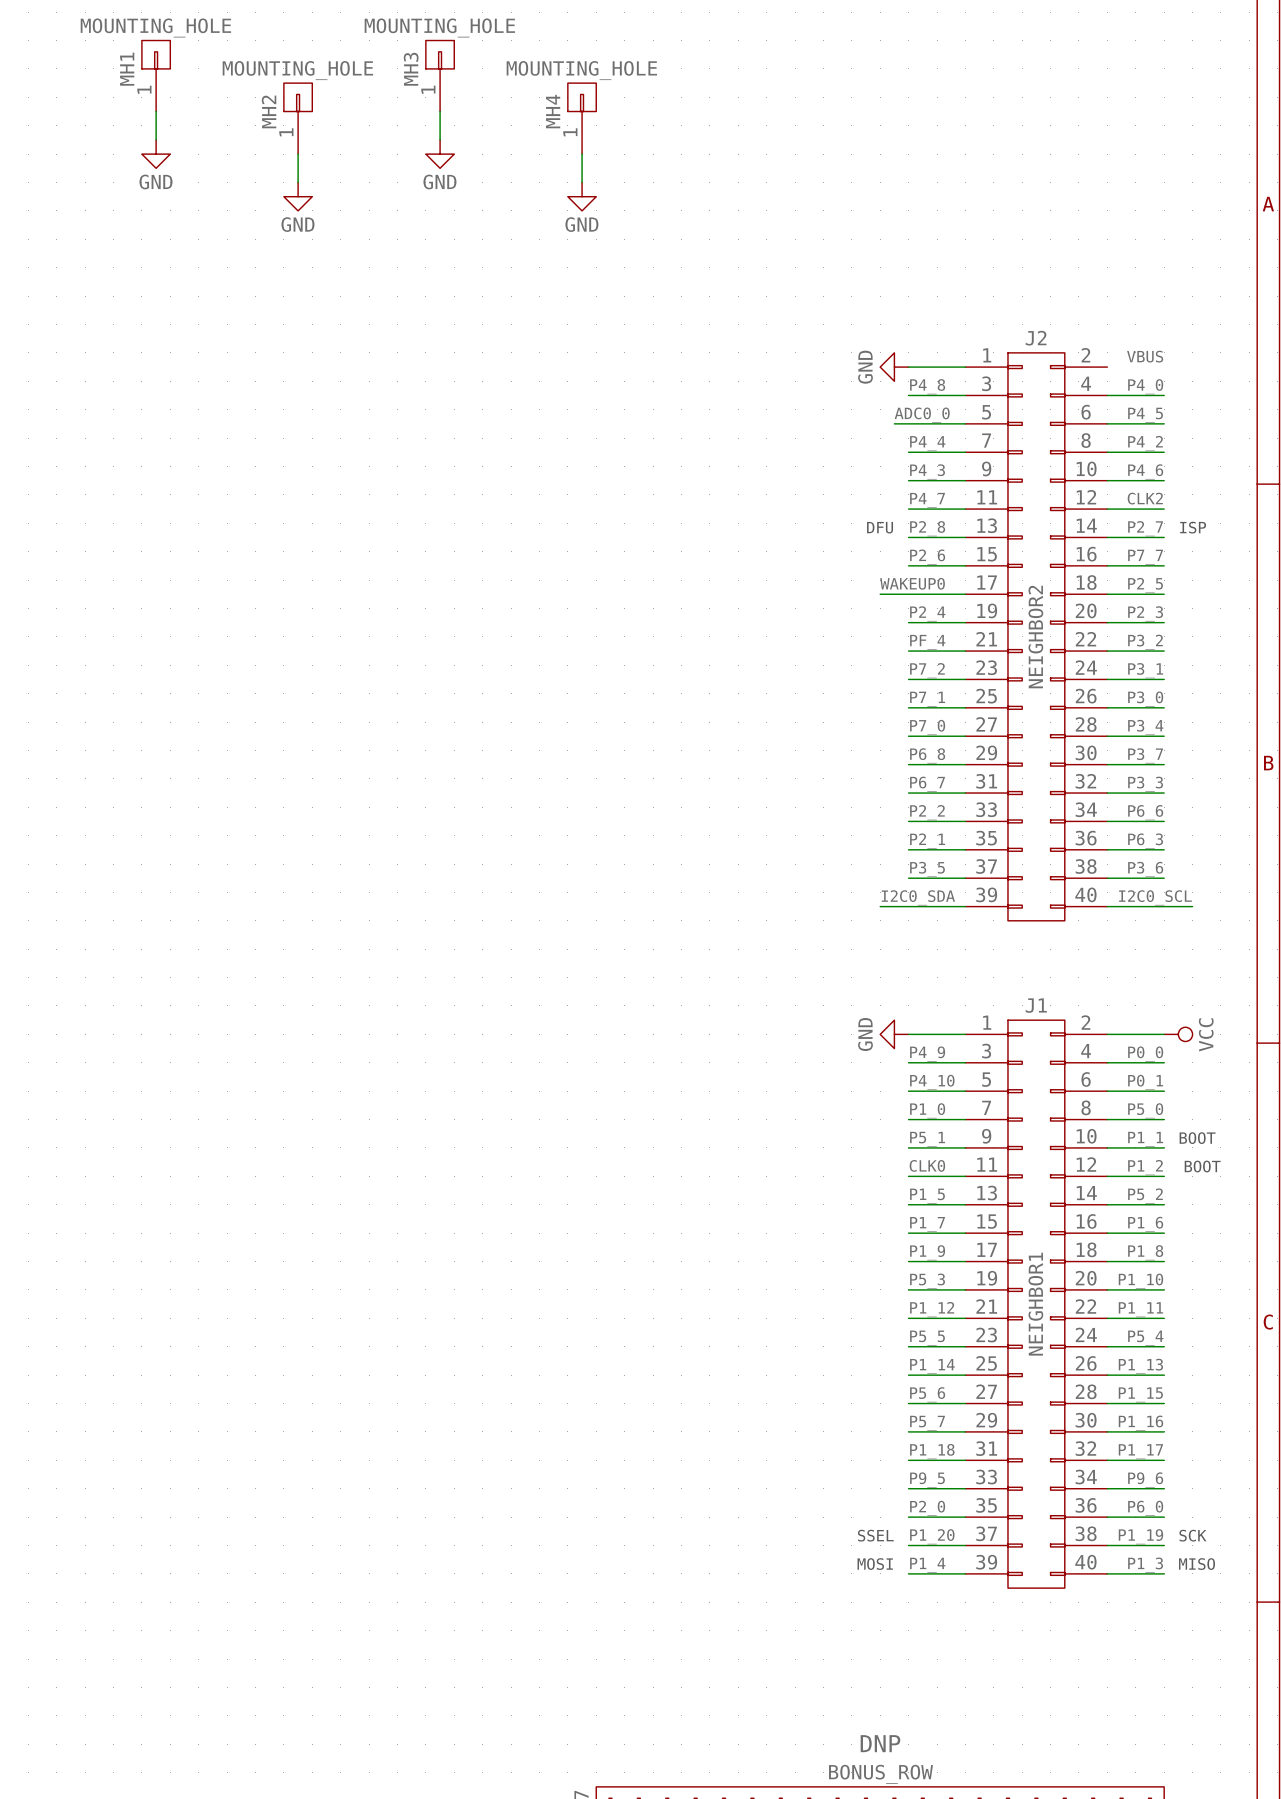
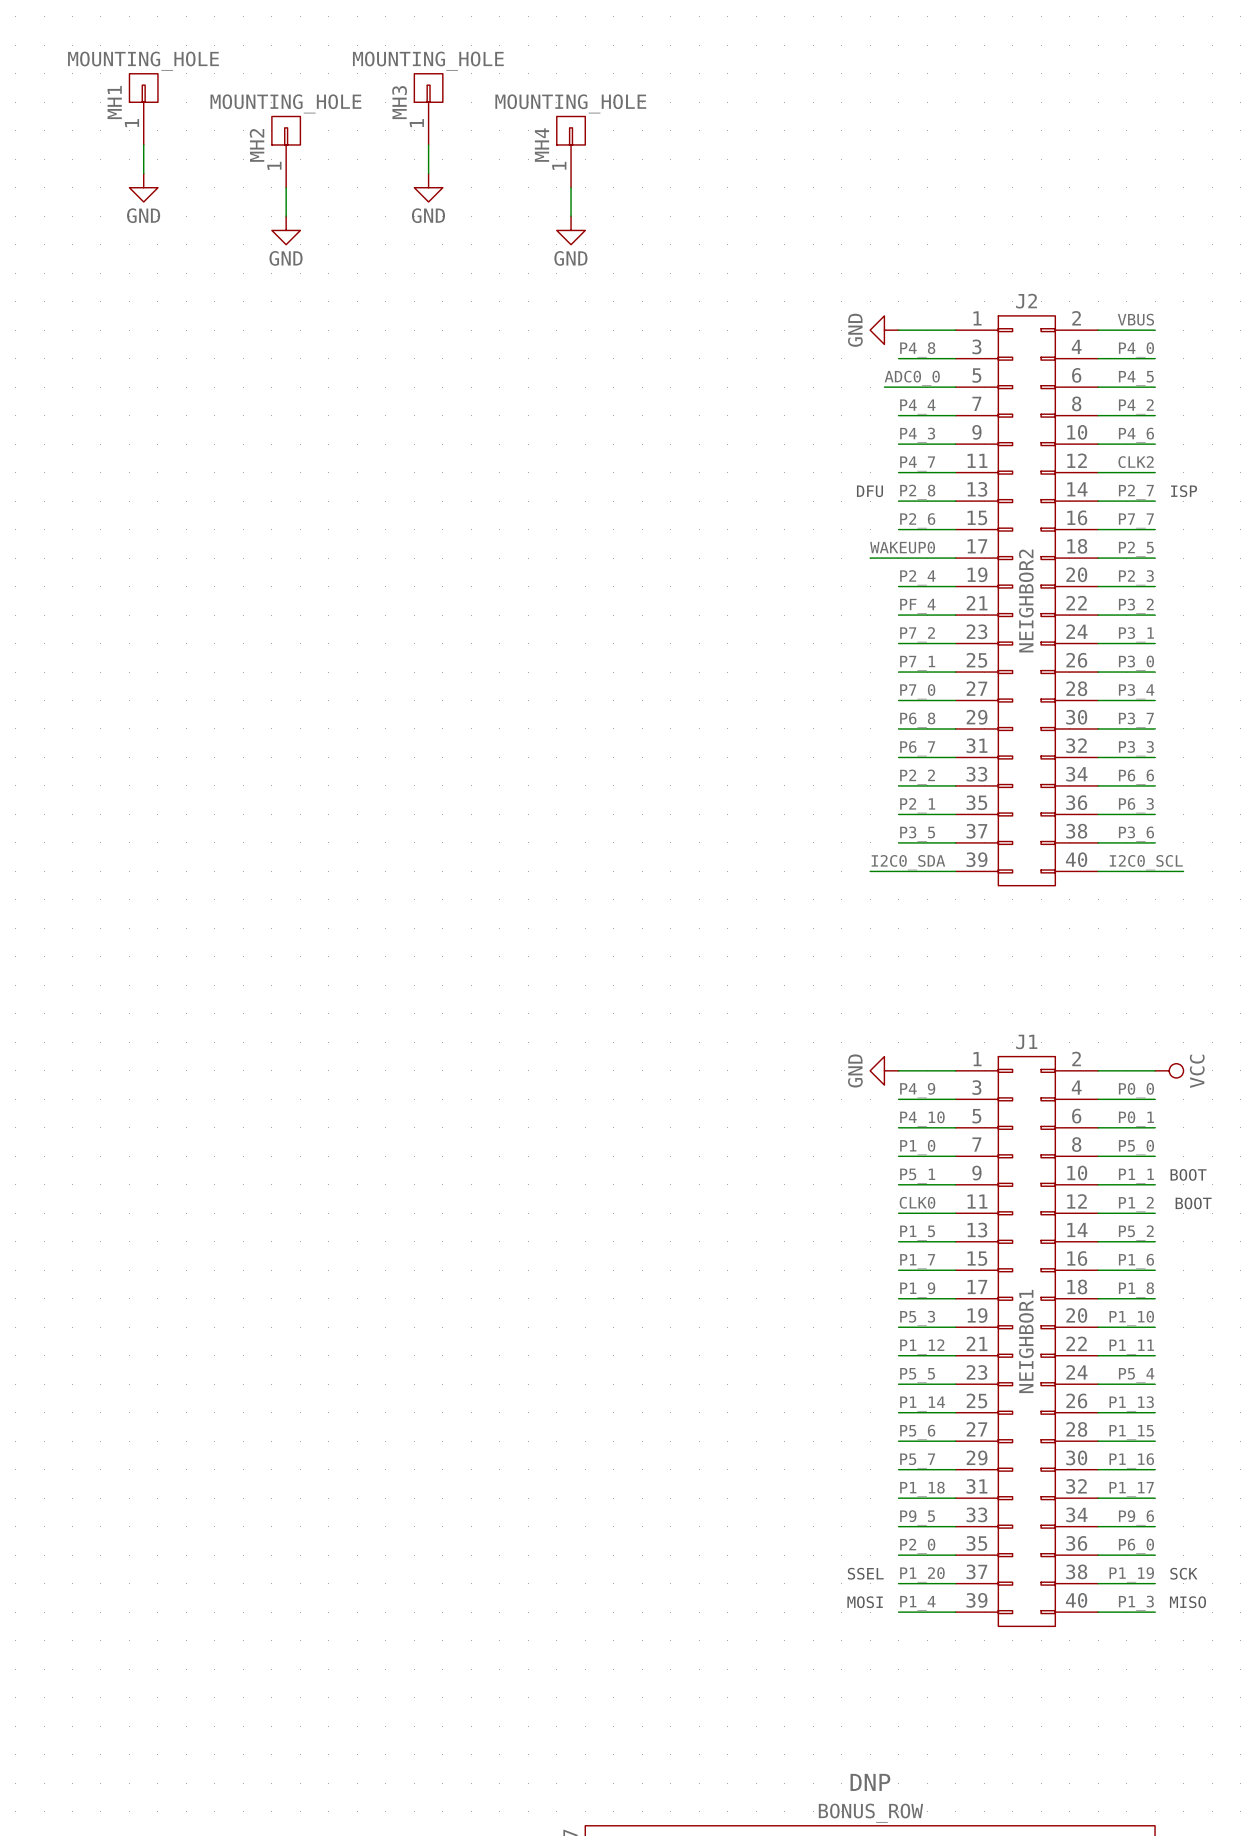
wire: none -> (1098, 330) (1155, 330)
label position: VBUS (1145, 356) -> VBUS (1135, 319)
power symbol position: GND (894, 367) -> GND (884, 330)
wire: (908, 367) (965, 367) -> (898, 330) (955, 330)
label position: P4_8 (927, 386) -> P4_8 (917, 349)
label position: P4_0 (1145, 386) -> P4_0 (1136, 349)
wire: (908, 395) (965, 395) -> (898, 358) (955, 358)
wire: (1107, 395) (1164, 395) -> (1098, 358) (1155, 358)
label position: ADC0_0 (922, 415) -> ADC0_0 (912, 378)
label position: P4_5 (1145, 415) -> P4_5 (1136, 378)
wire: (894, 423) (965, 423) -> (884, 387) (955, 387)
wire: (1107, 423) (1164, 423) -> (1098, 387) (1155, 387)
label position: P4_4 (927, 443) -> P4_4 (917, 406)
label position: P4_2 (1145, 443) -> P4_2 (1136, 406)
wire: (908, 452) (965, 452) -> (898, 415) (955, 415)
wire: (1107, 452) (1164, 452) -> (1098, 415) (1155, 415)
label position: P4_3 (927, 471) -> P4_3 (917, 435)
label position: P4_6 (1145, 471) -> P4_6 (1136, 435)
wire: (908, 480) (965, 480) -> (898, 444) (955, 444)
wire: (1107, 480) (1164, 480) -> (1098, 444) (1155, 444)
label position: CLK2 (1145, 498) -> CLK2 (1136, 462)
label position: P4_7 (927, 500) -> P4_7 (917, 463)
wire: (908, 509) (965, 509) -> (898, 472) (955, 472)
wire: (1107, 509) (1164, 509) -> (1098, 472) (1155, 472)
text position: DFU (880, 527) -> DFU (869, 491)
text position: ISP (1193, 527) -> ISP (1184, 491)
label position: P2_8 (927, 528) -> P2_8 (917, 492)
label position: P2_7 (1145, 528) -> P2_7 (1136, 492)
wire: (908, 537) (965, 537) -> (898, 501) (955, 501)
wire: (1107, 537) (1164, 537) -> (1098, 501) (1155, 501)
label position: P2_6 (927, 557) -> P2_6 (917, 520)
label position: P7_7 (1145, 557) -> P7_7 (1136, 520)
wire: (908, 565) (965, 565) -> (898, 529) (955, 529)
wire: (1107, 565) (1164, 565) -> (1098, 529) (1155, 529)
label position: WAKEUP0 (912, 583) -> WAKEUP0 (902, 547)
label position: P2_5 (1145, 585) -> P2_5 (1136, 549)
wire: (880, 594) (965, 594) -> (870, 558) (955, 558)
wire: (1107, 594) (1164, 594) -> (1098, 558) (1155, 558)
label position: P2_4 (927, 613) -> P2_4 (917, 577)
label position: P2_3 (1145, 613) -> P2_3 (1136, 577)
wire: (908, 622) (965, 622) -> (898, 586) (955, 586)
wire: (1107, 622) (1164, 622) -> (1098, 586) (1155, 586)
J2 position: (1036, 636) -> (1026, 600)
label position: PF_4 (927, 642) -> PF_4 (917, 606)
label position: P3_2 (1145, 642) -> P3_2 (1136, 606)
wire: (908, 651) (965, 651) -> (898, 615) (955, 615)
wire: (1107, 651) (1164, 651) -> (1098, 615) (1155, 615)
label position: P7_2 (927, 670) -> P7_2 (917, 634)
label position: P3_1 (1145, 670) -> P3_1 (1136, 634)
wire: (908, 679) (965, 679) -> (898, 643) (955, 643)
wire: (1107, 679) (1164, 679) -> (1098, 643) (1155, 643)
label position: P7_1 (927, 699) -> P7_1 (917, 663)
label position: P3_0 (1145, 699) -> P3_0 (1136, 663)
wire: (908, 707) (965, 707) -> (898, 672) (955, 672)
wire: (1107, 707) (1164, 707) -> (1098, 672) (1155, 672)
label position: P7_0 (927, 727) -> P7_0 (917, 691)
label position: P3_4 (1145, 727) -> P3_4 (1136, 691)
wire: (908, 736) (965, 736) -> (898, 700) (955, 700)
wire: (1107, 736) (1164, 736) -> (1098, 700) (1155, 700)
label position: P6_8 (927, 755) -> P6_8 (917, 720)
label position: P3_7 (1145, 755) -> P3_7 (1136, 720)
wire: (908, 764) (965, 764) -> (898, 728) (955, 728)
wire: (1107, 764) (1164, 764) -> (1098, 728) (1155, 728)
label position: P6_7 (927, 784) -> P6_7 (917, 748)
label position: P3_3 (1145, 784) -> P3_3 (1136, 748)
wire: (908, 793) (965, 793) -> (898, 757) (955, 757)
wire: (1107, 793) (1164, 793) -> (1098, 757) (1155, 757)
label position: P2_2 (927, 812) -> P2_2 (917, 777)
label position: P6_6 (1145, 812) -> P6_6 (1136, 777)
wire: (908, 821) (965, 821) -> (898, 785) (955, 785)
wire: (1107, 821) (1164, 821) -> (1098, 785) (1155, 785)
label position: P2_1 (927, 841) -> P2_1 (917, 805)
label position: P6_3 (1145, 841) -> P6_3 (1136, 805)
wire: (908, 849) (965, 849) -> (898, 814) (955, 814)
wire: (1107, 849) (1164, 849) -> (1098, 814) (1155, 814)
label position: P3_5 (927, 869) -> P3_5 (917, 834)
label position: P3_6 (1145, 869) -> P3_6 (1136, 834)
wire: (908, 878) (965, 878) -> (898, 842) (955, 842)
wire: (1107, 878) (1164, 878) -> (1098, 842) (1155, 842)
label position: I2C0_SDA (918, 897) -> I2C0_SDA (908, 862)
label position: I2C0_SCL (1155, 897) -> I2C0_SCL (1146, 862)
wire: (880, 906) (965, 906) -> (870, 871) (955, 871)
wire: (1107, 906) (1192, 906) -> (1098, 871) (1183, 871)

